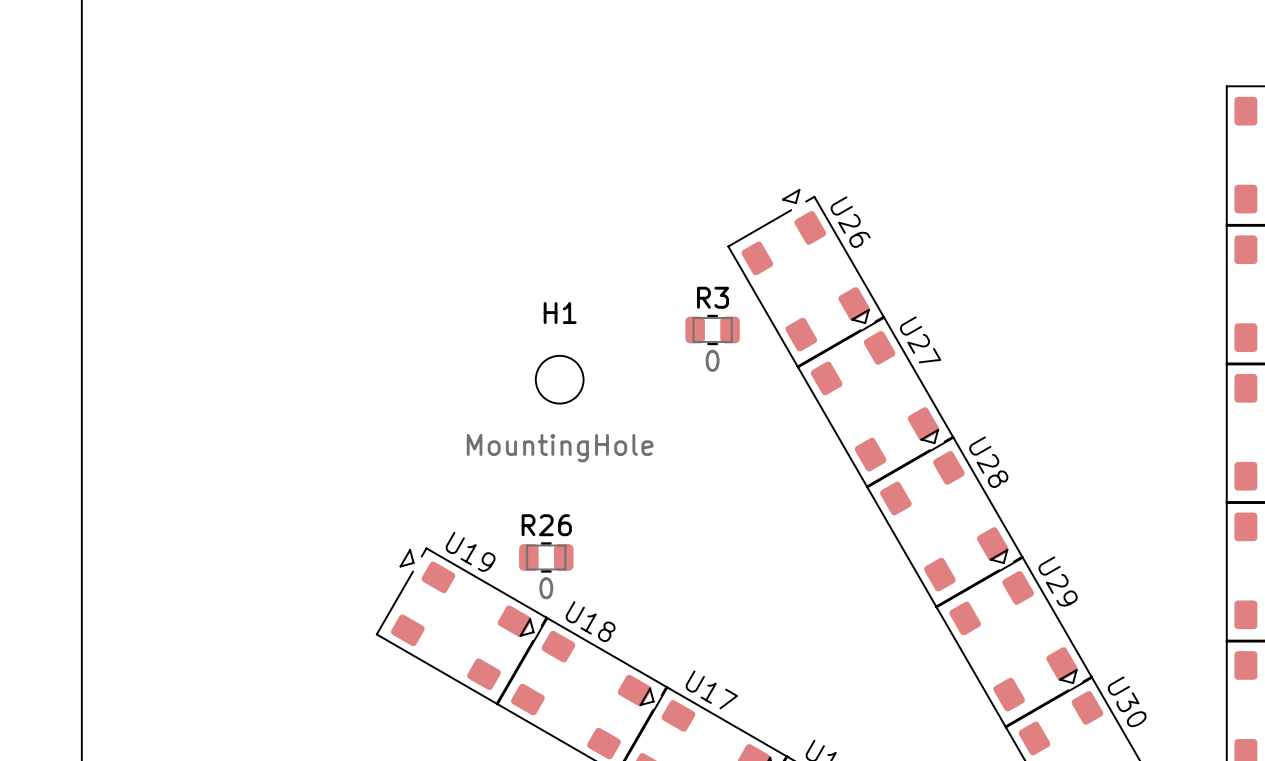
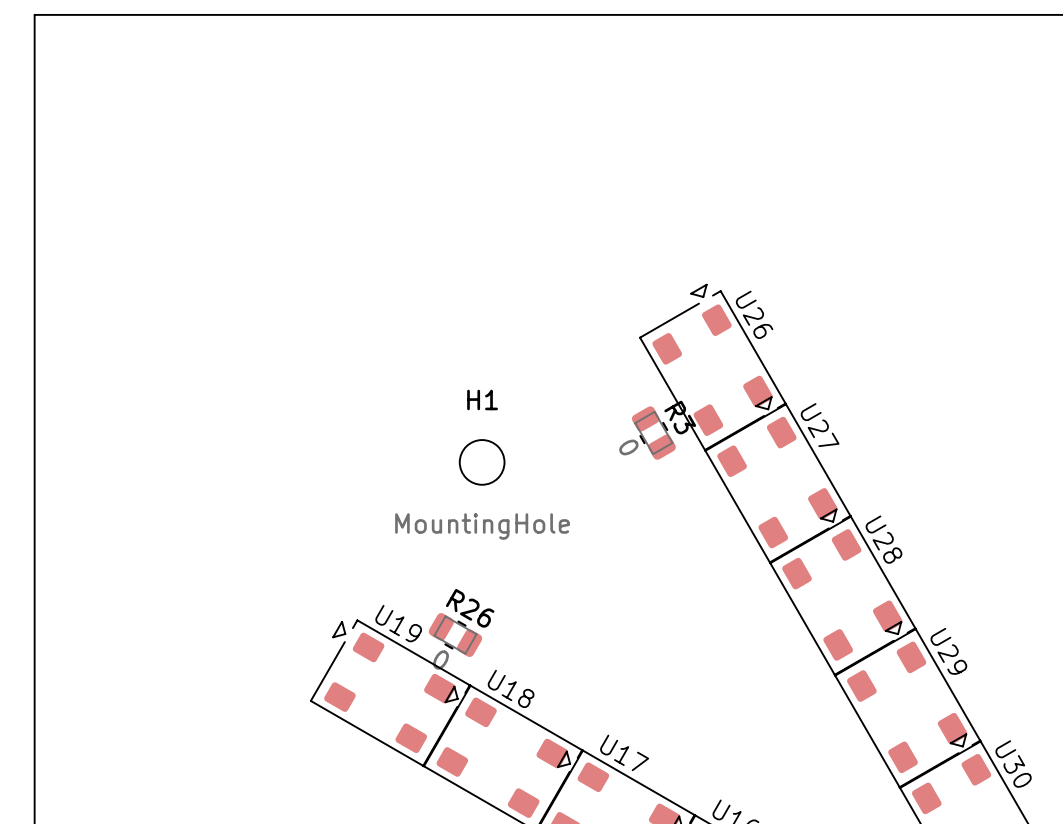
R3 rotation: 0° (712, 330) -> 60° clockwise (653, 433)
R3 position: (712, 330) -> (653, 433)
R26 rotation: 0° (546, 557) -> 30° clockwise (455, 635)

